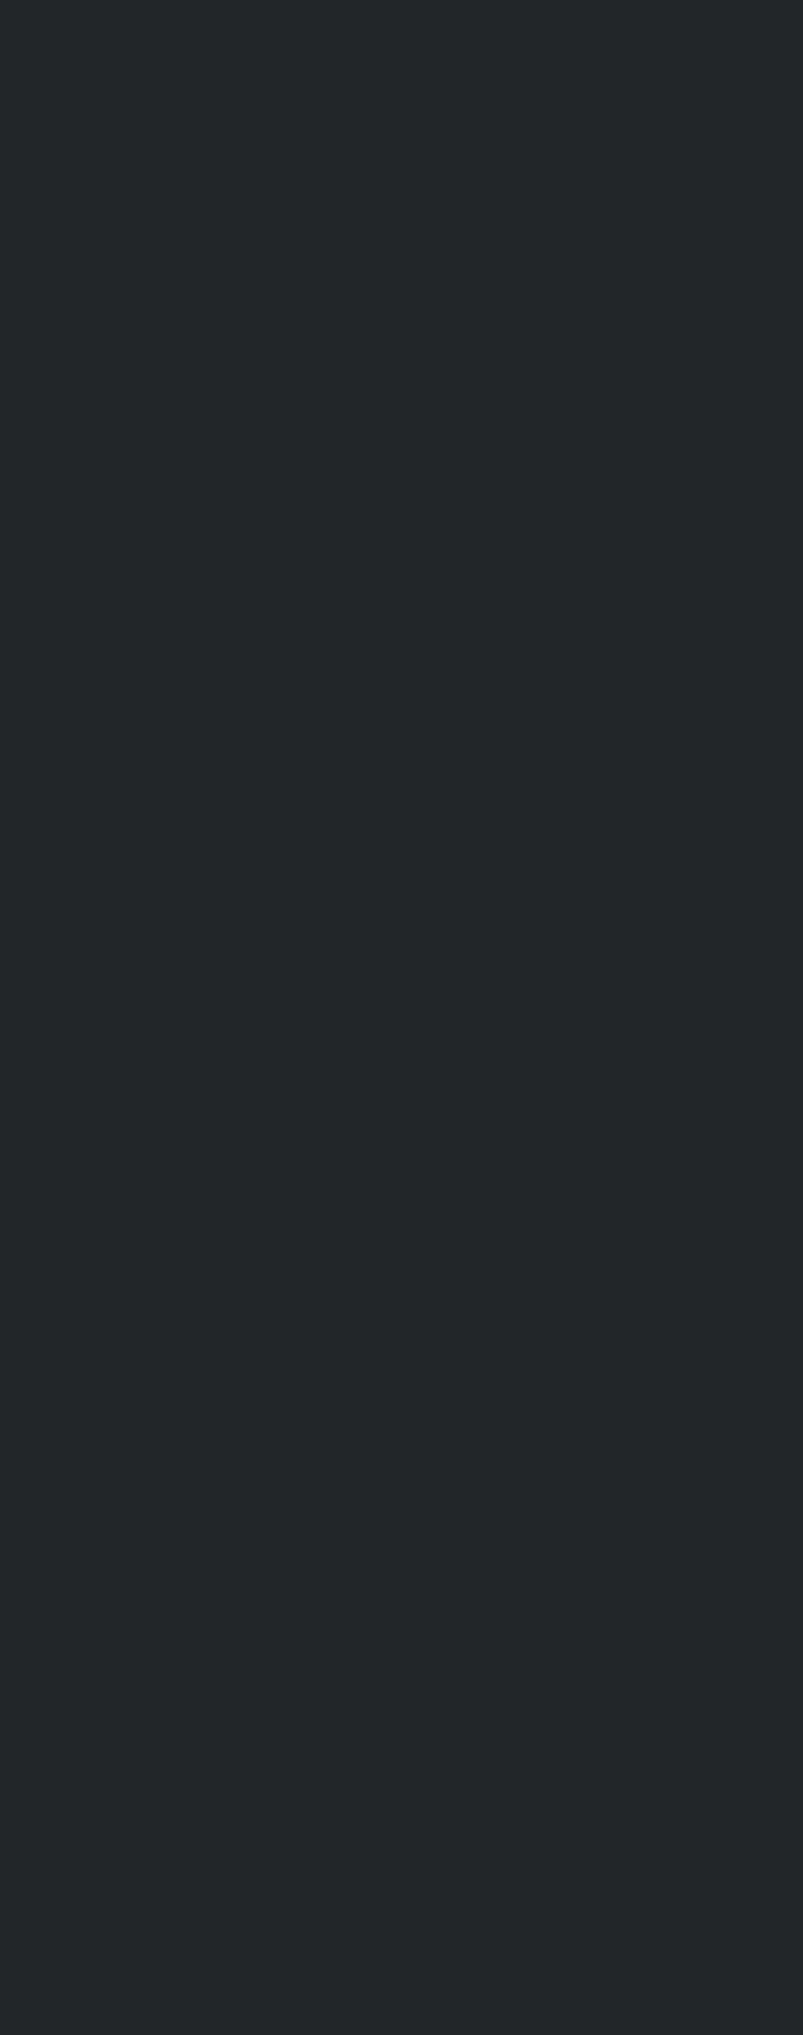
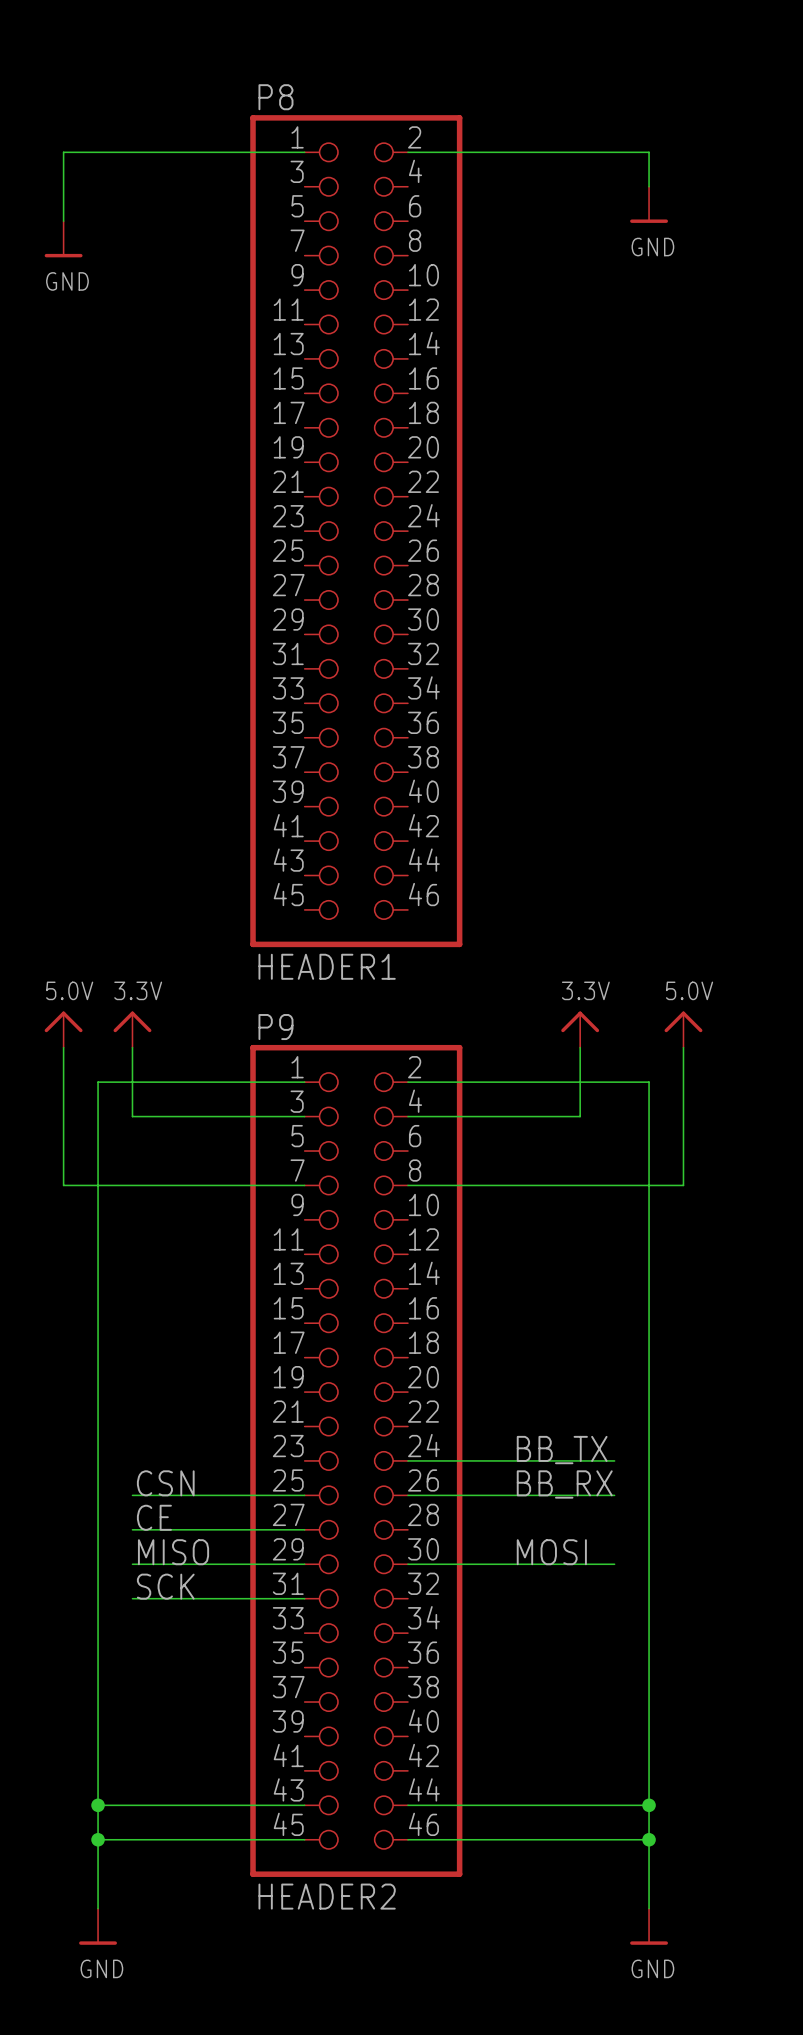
wire: none -> (304, 152) (63, 152) (63, 221)
wire: none -> (407, 152) (649, 152) (649, 186)
power symbol: none -> GND (649, 204)
power symbol: none -> GND (63, 239)
P8: none -> HEADER1 (356, 531)
power symbol: none -> 5.0V (63, 1029)
power symbol: none -> 3.3V (132, 1029)
power symbol: none -> 3.3V (580, 1029)
power symbol: none -> 5.0V (683, 1029)
wire: none -> (63, 1047) (63, 1185) (304, 1185)
wire: none -> (132, 1047) (132, 1116) (304, 1116)
wire: none -> (580, 1047) (580, 1116) (407, 1116)
wire: none -> (683, 1047) (683, 1185) (407, 1185)
wire: none -> (304, 1082) (98, 1082) (98, 1908)
wire: none -> (407, 1082) (649, 1082) (649, 1908)
label: none -> BB_TX (562, 1450)
P9: none -> HEADER2 (356, 1460)
wire: none -> (407, 1460) (614, 1460)
label: none -> CSN (165, 1483)
label: none -> BB_RX (564, 1484)
wire: none -> (132, 1495) (304, 1495)
wire: none -> (407, 1495) (614, 1495)
label: none -> CE (154, 1517)
wire: none -> (132, 1529) (304, 1529)
label: none -> MISO (173, 1552)
label: none -> MOSI (551, 1552)
wire: none -> (132, 1564) (304, 1564)
wire: none -> (407, 1564) (614, 1564)
label: none -> SCK (165, 1586)
wire: none -> (132, 1598) (304, 1598)
wire: none -> (98, 1805) (304, 1805)
junction: none -> (98, 1805)
wire: none -> (407, 1805) (649, 1805)
junction: none -> (649, 1805)
wire: none -> (98, 1839) (304, 1839)
junction: none -> (98, 1839)
wire: none -> (407, 1839) (649, 1839)
junction: none -> (649, 1839)
power symbol: none -> GND (98, 1926)
power symbol: none -> GND (649, 1926)

